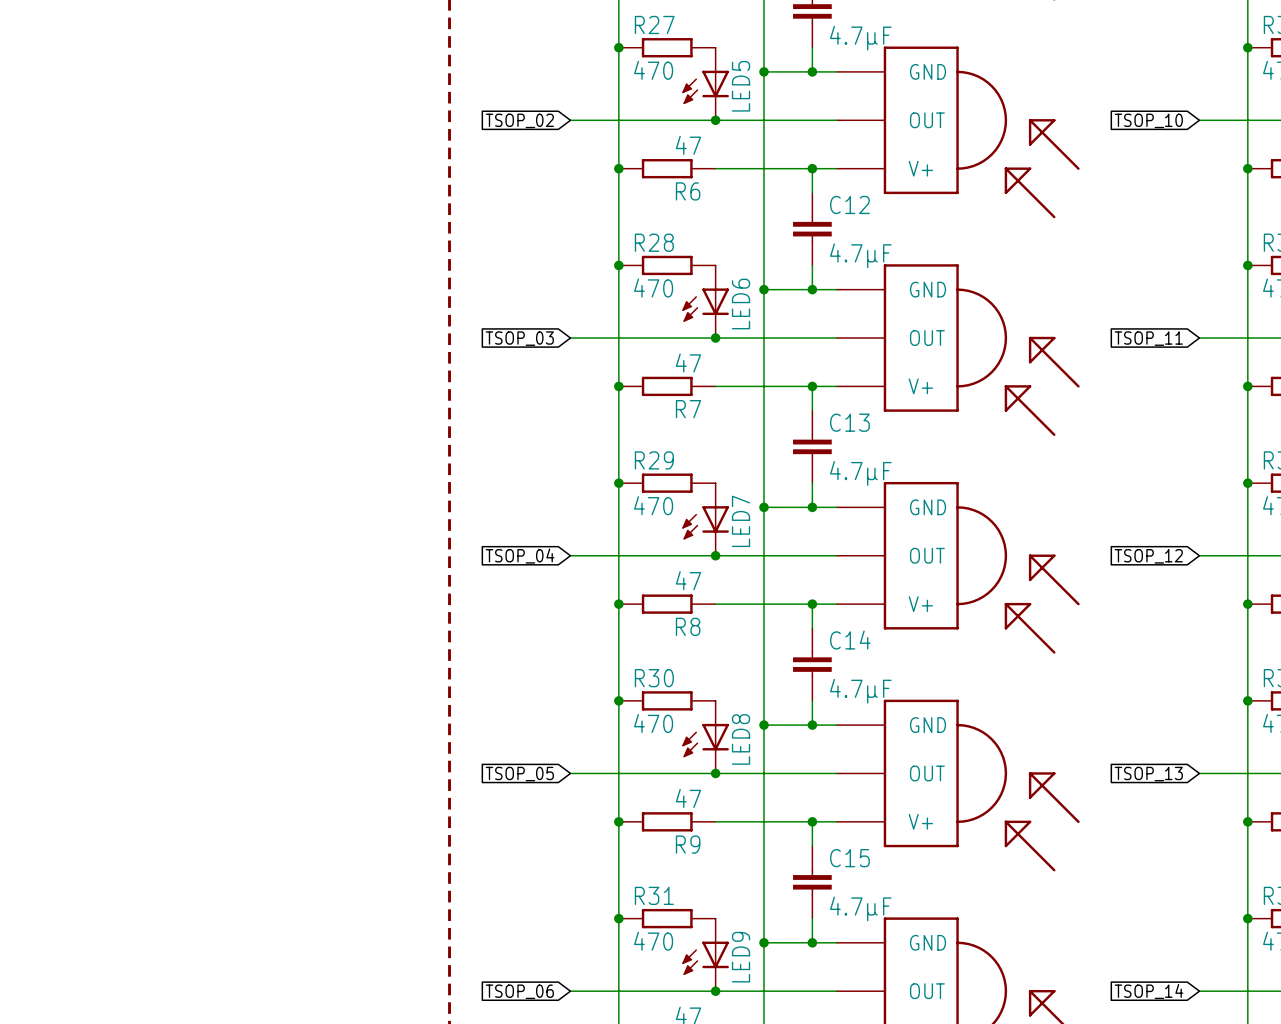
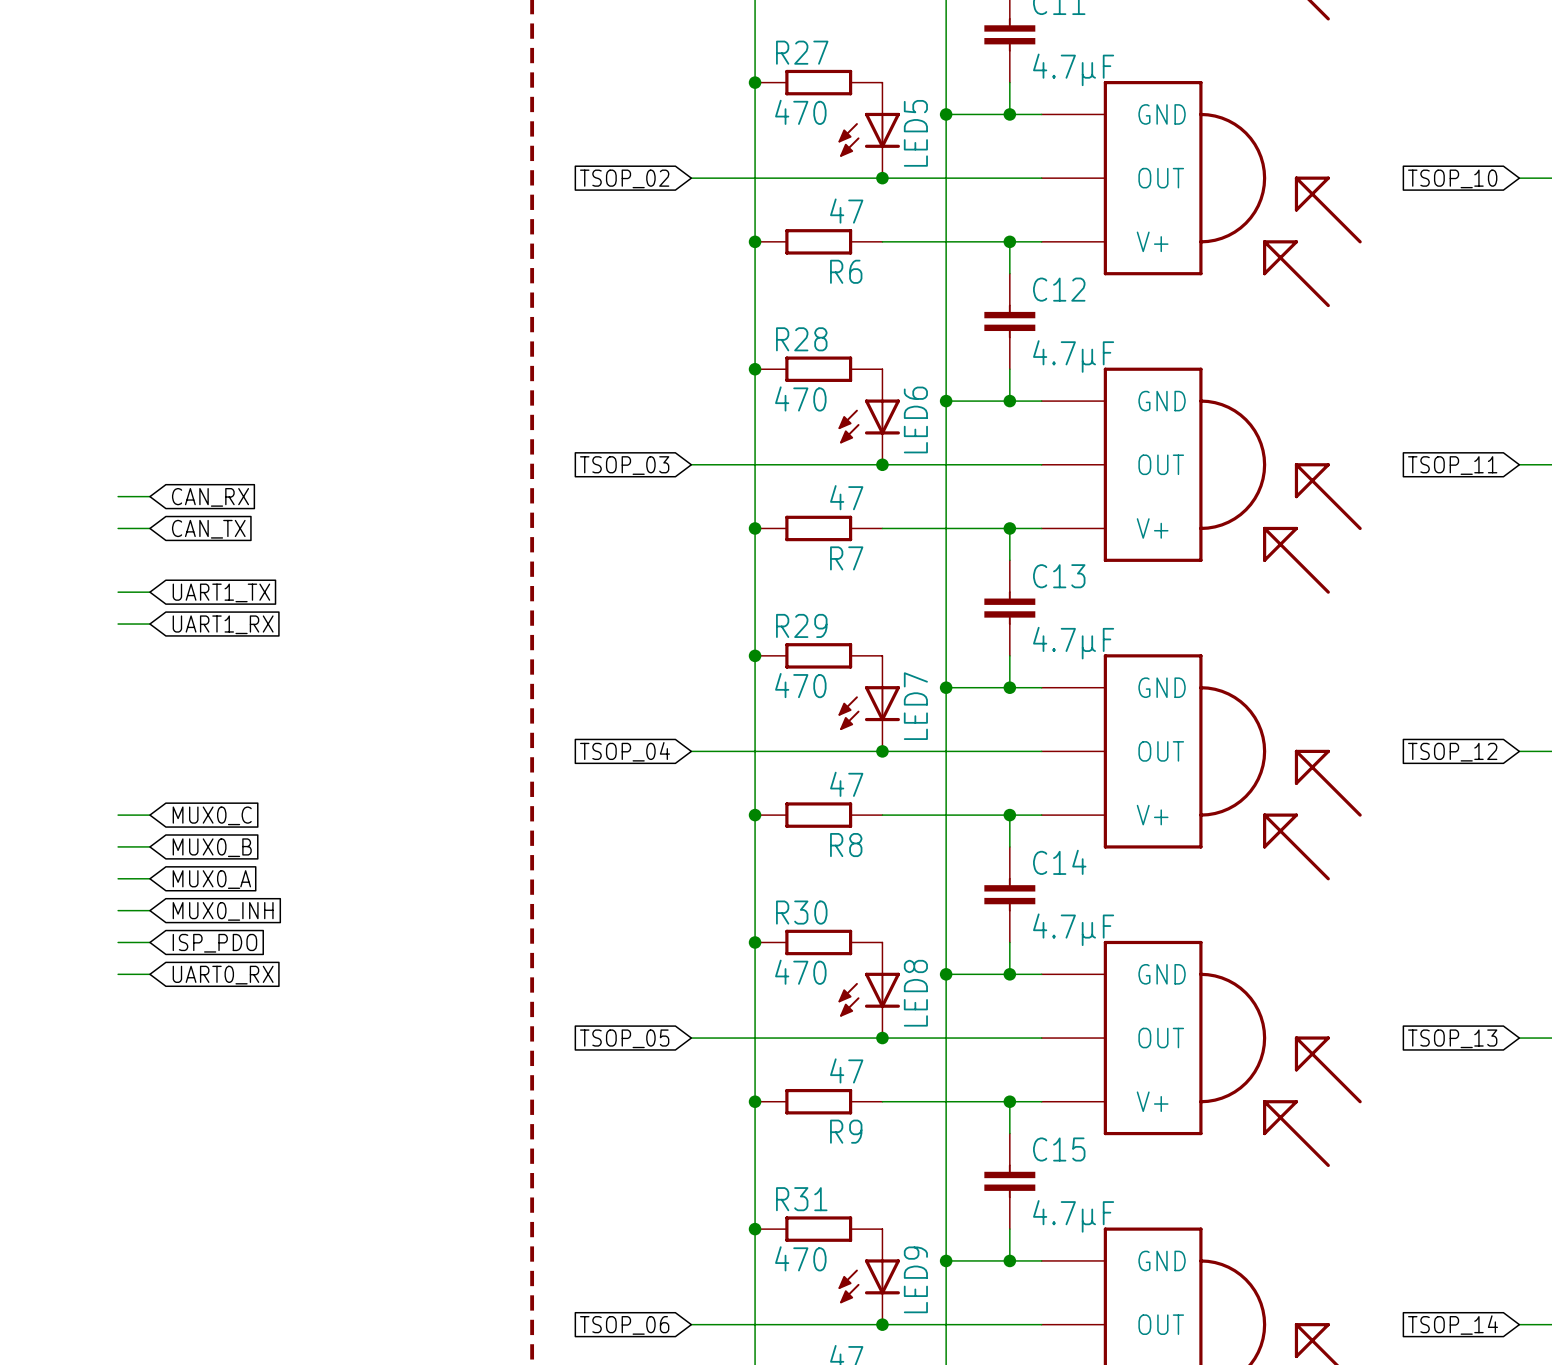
wire: none -> (118, 496) (149, 496)
global label: none -> CAN_RX (210, 497)
wire: none -> (118, 528) (149, 528)
global label: none -> CAN_TX (208, 529)
wire: none -> (118, 592) (149, 592)
global label: none -> UART1_TX (221, 592)
wire: none -> (118, 624) (149, 624)
global label: none -> UART1_RX (223, 624)
wire: none -> (118, 815) (149, 815)
global label: none -> MUX0_C (212, 815)
wire: none -> (118, 846) (149, 846)
global label: none -> MUX0_B (212, 847)
wire: none -> (118, 878) (149, 878)
global label: none -> MUX0_A (211, 879)
wire: none -> (118, 910) (149, 910)
global label: none -> MUX0_INH (223, 911)
wire: none -> (118, 942) (149, 942)
global label: none -> ISP_PDO (214, 943)
wire: none -> (118, 974) (149, 974)
global label: none -> UART0_RX (223, 975)

